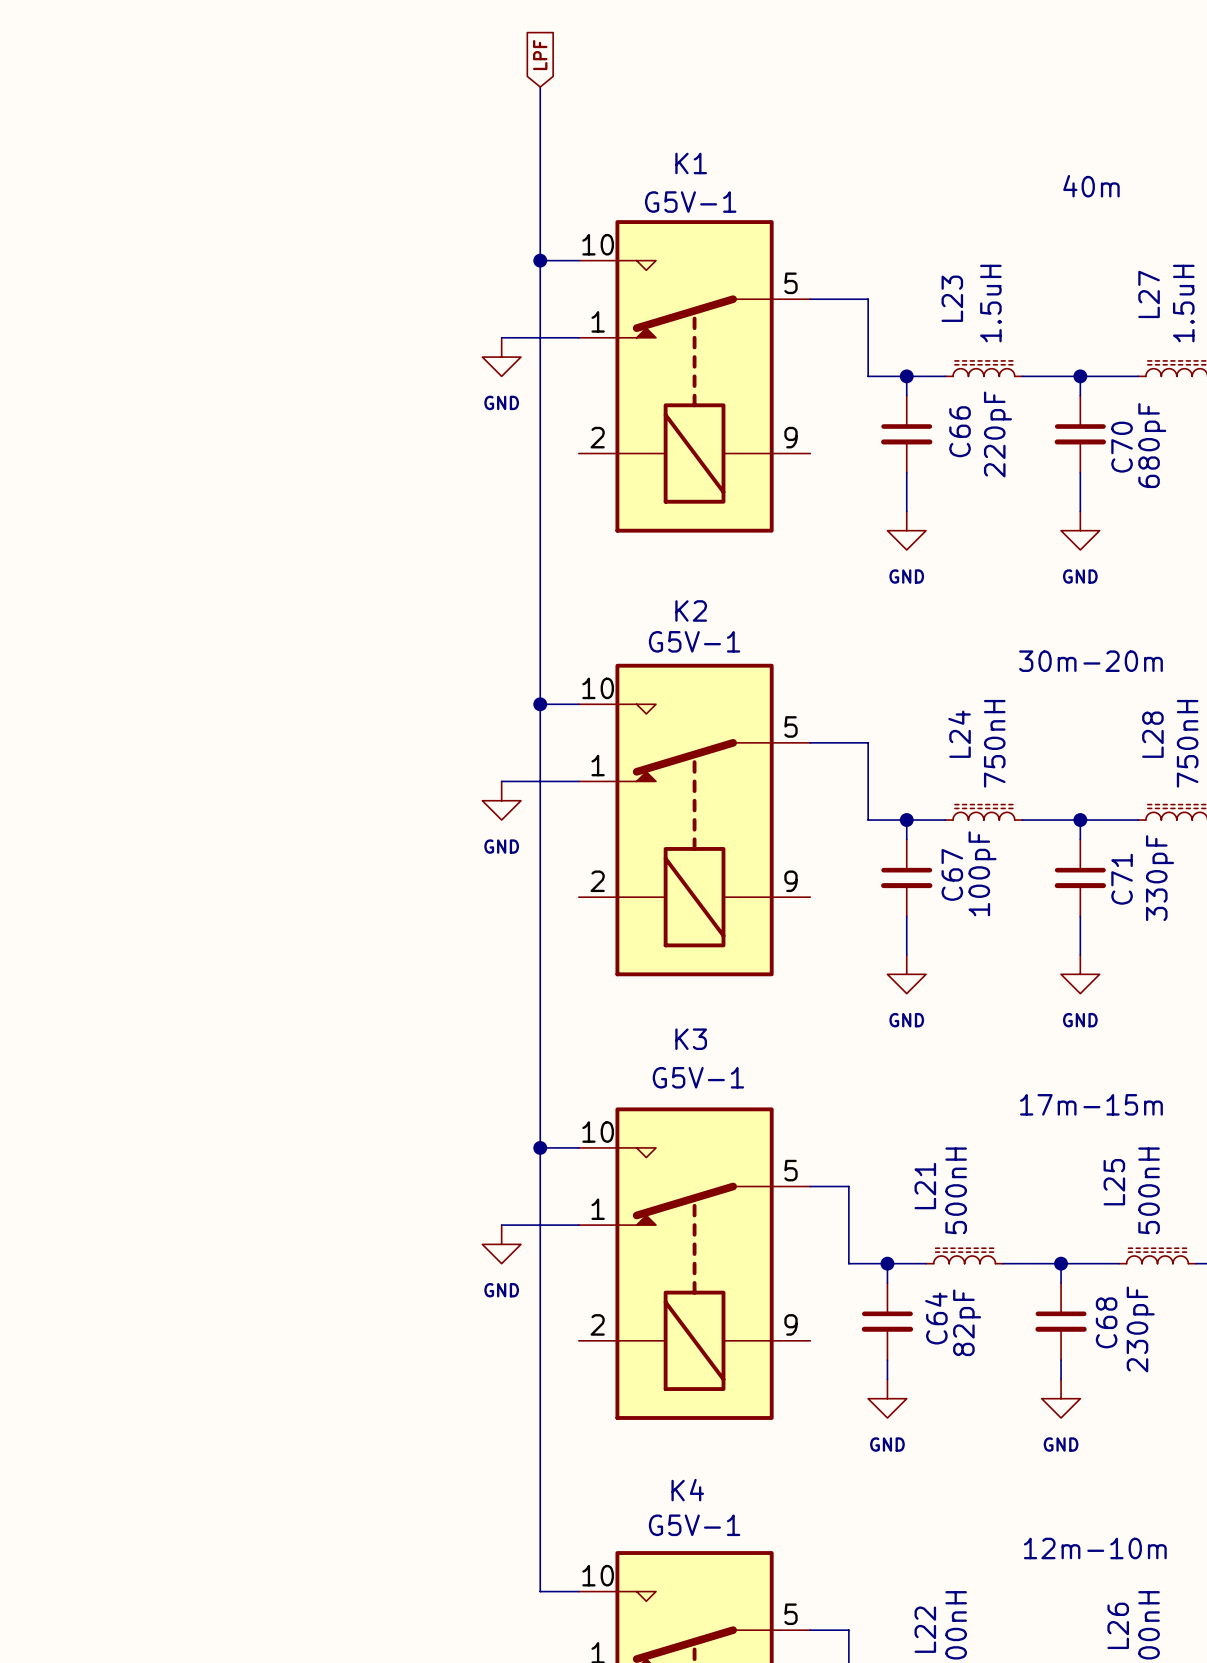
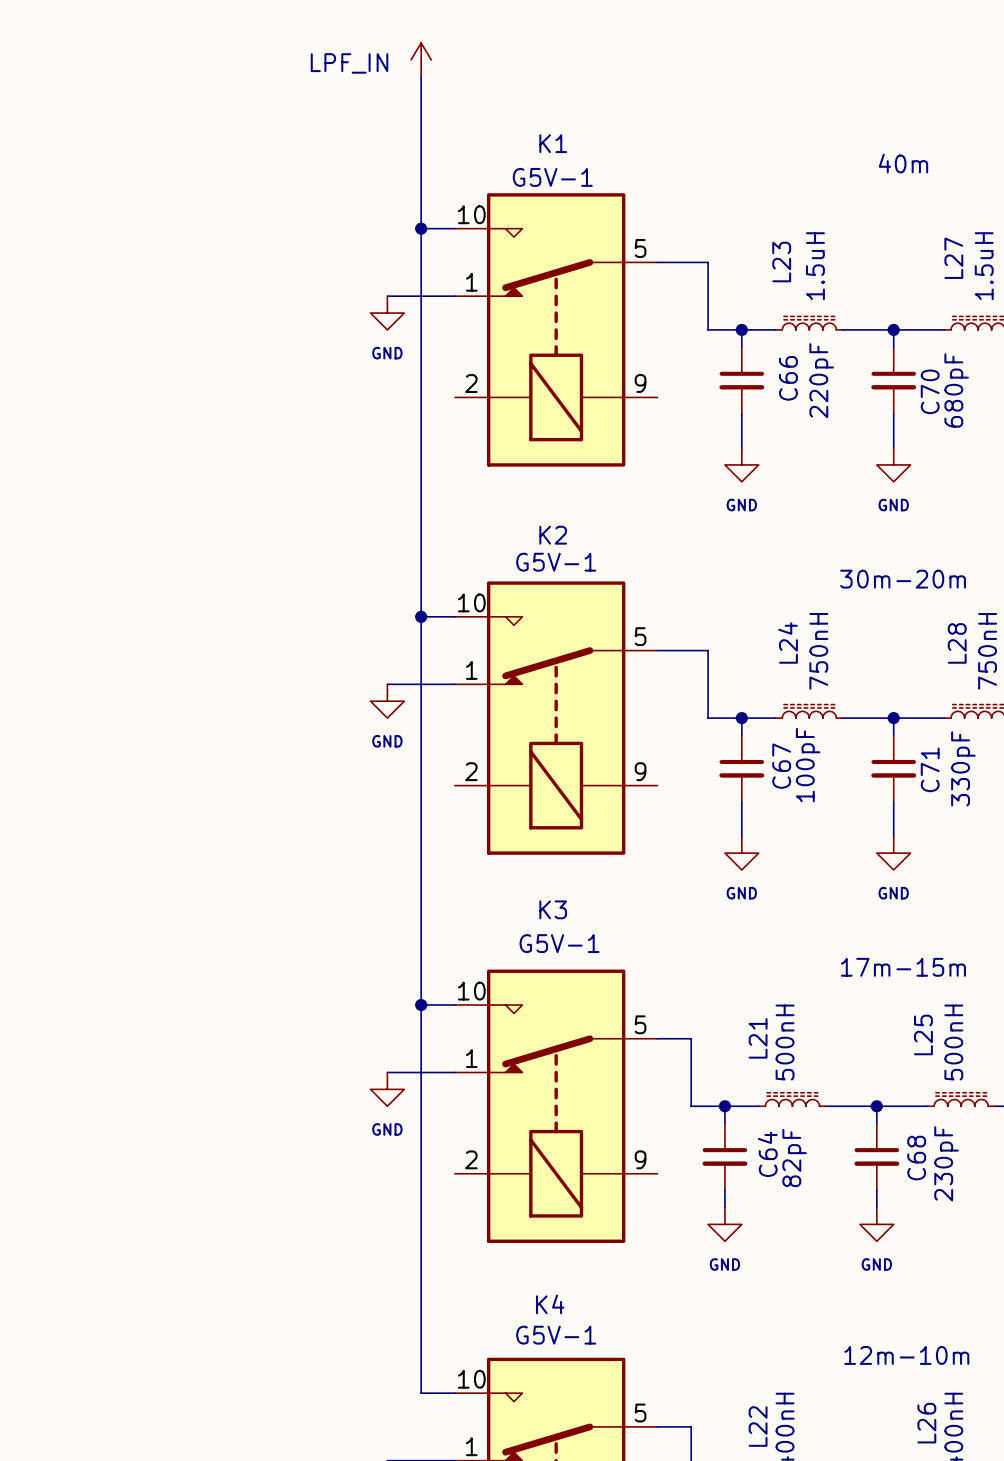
global label: LPF (540, 55) -> none
power symbol: none -> LPF_IN (421, 59)

